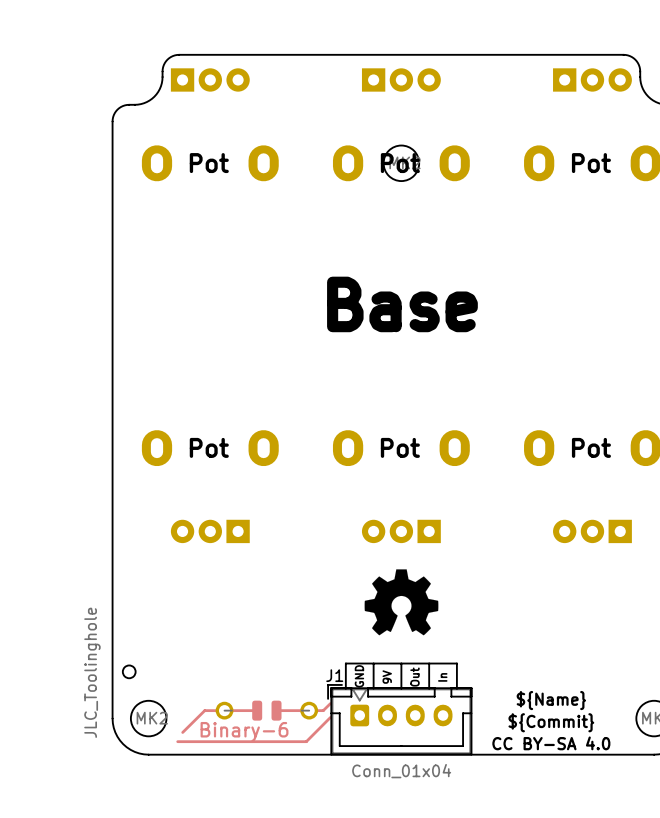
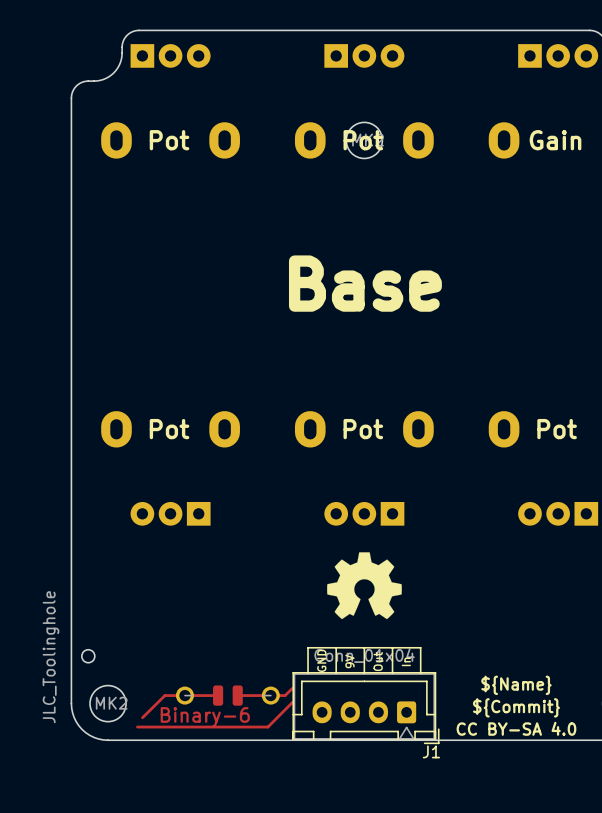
text: Pot (591, 163) -> Gain (555, 140)
J1 rotation: 0° (399, 719) -> 180° (365, 708)

